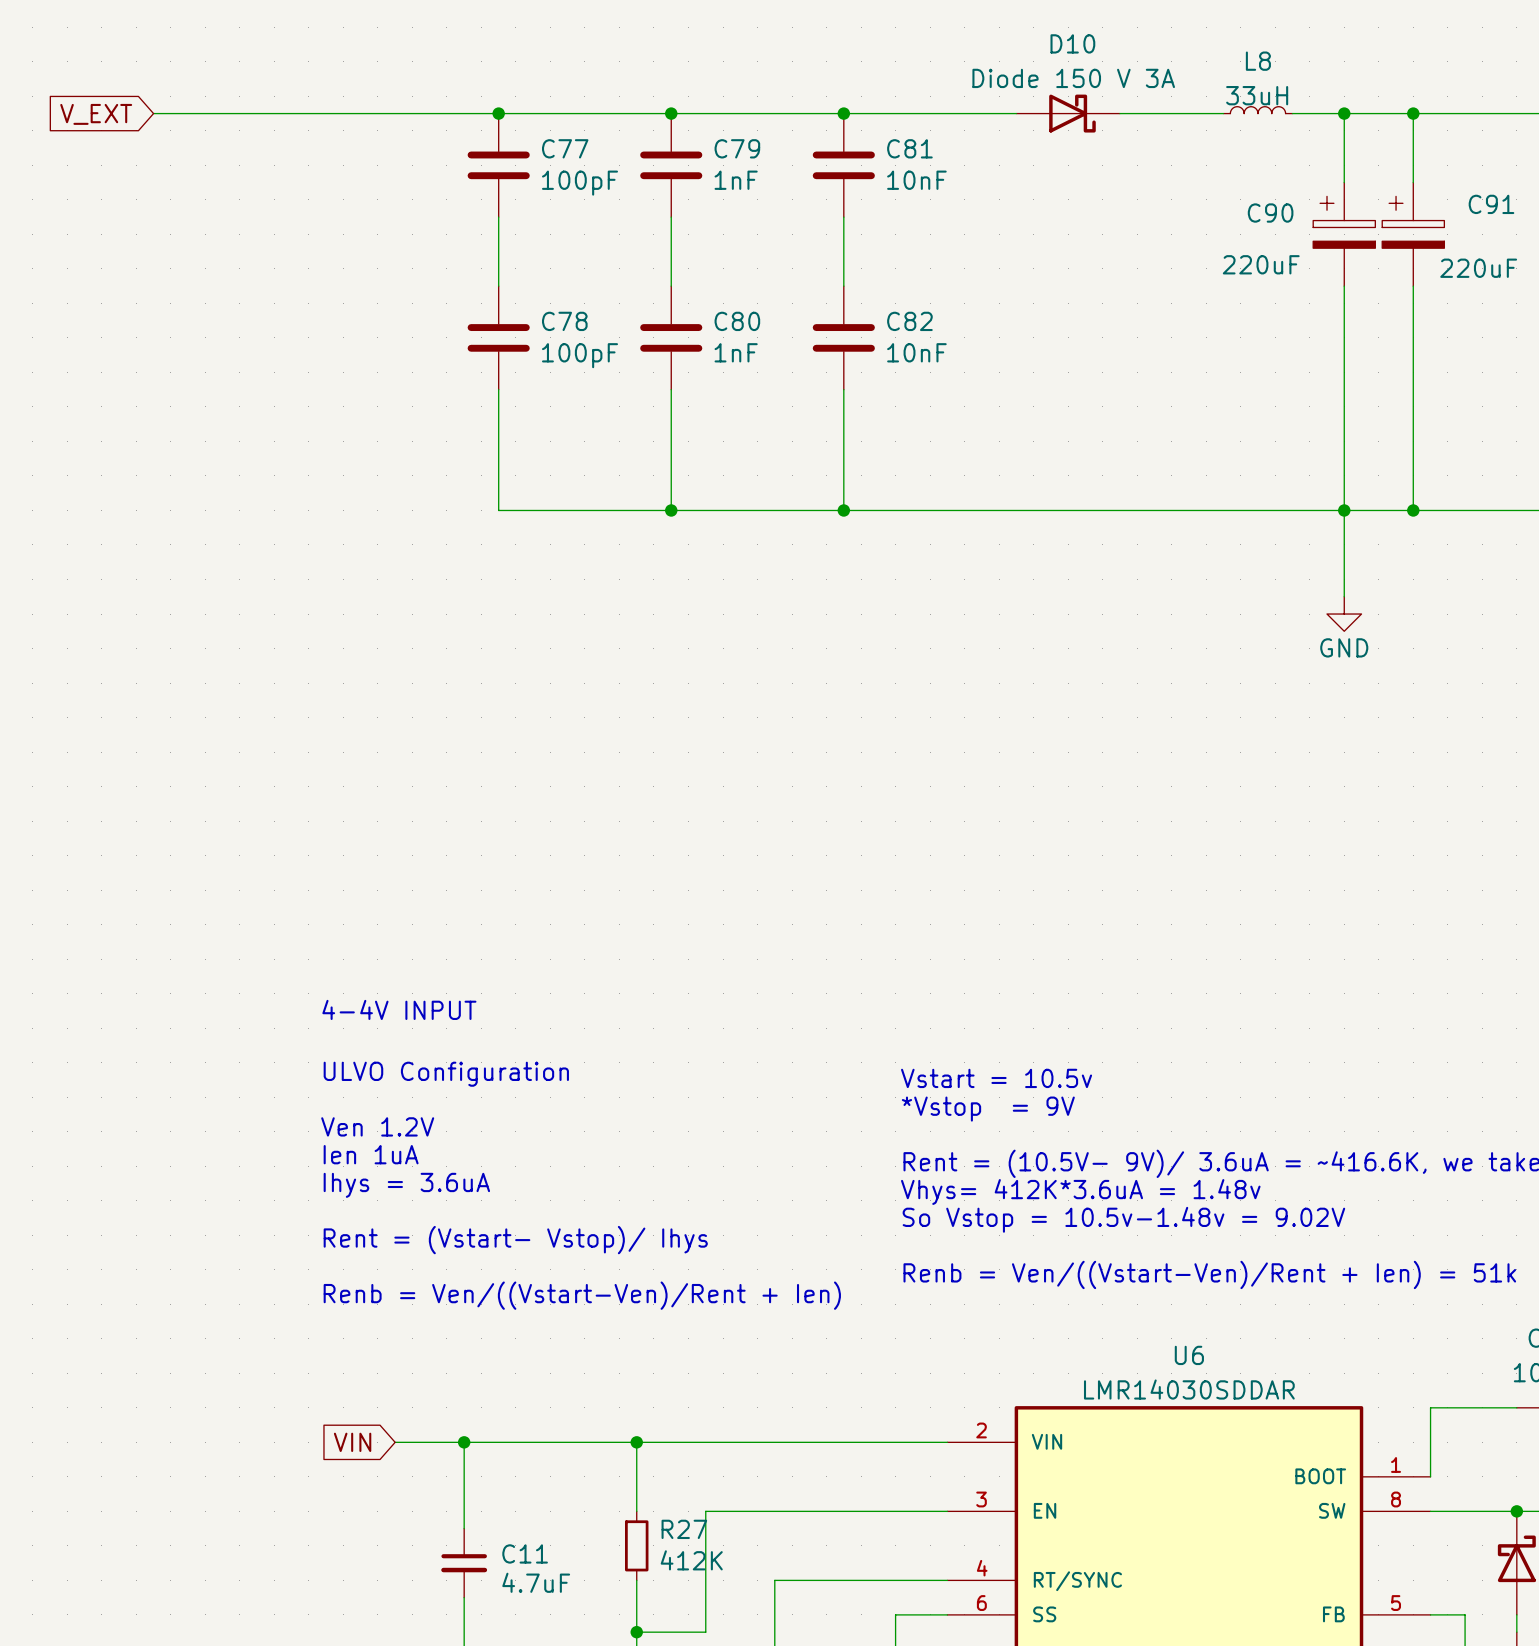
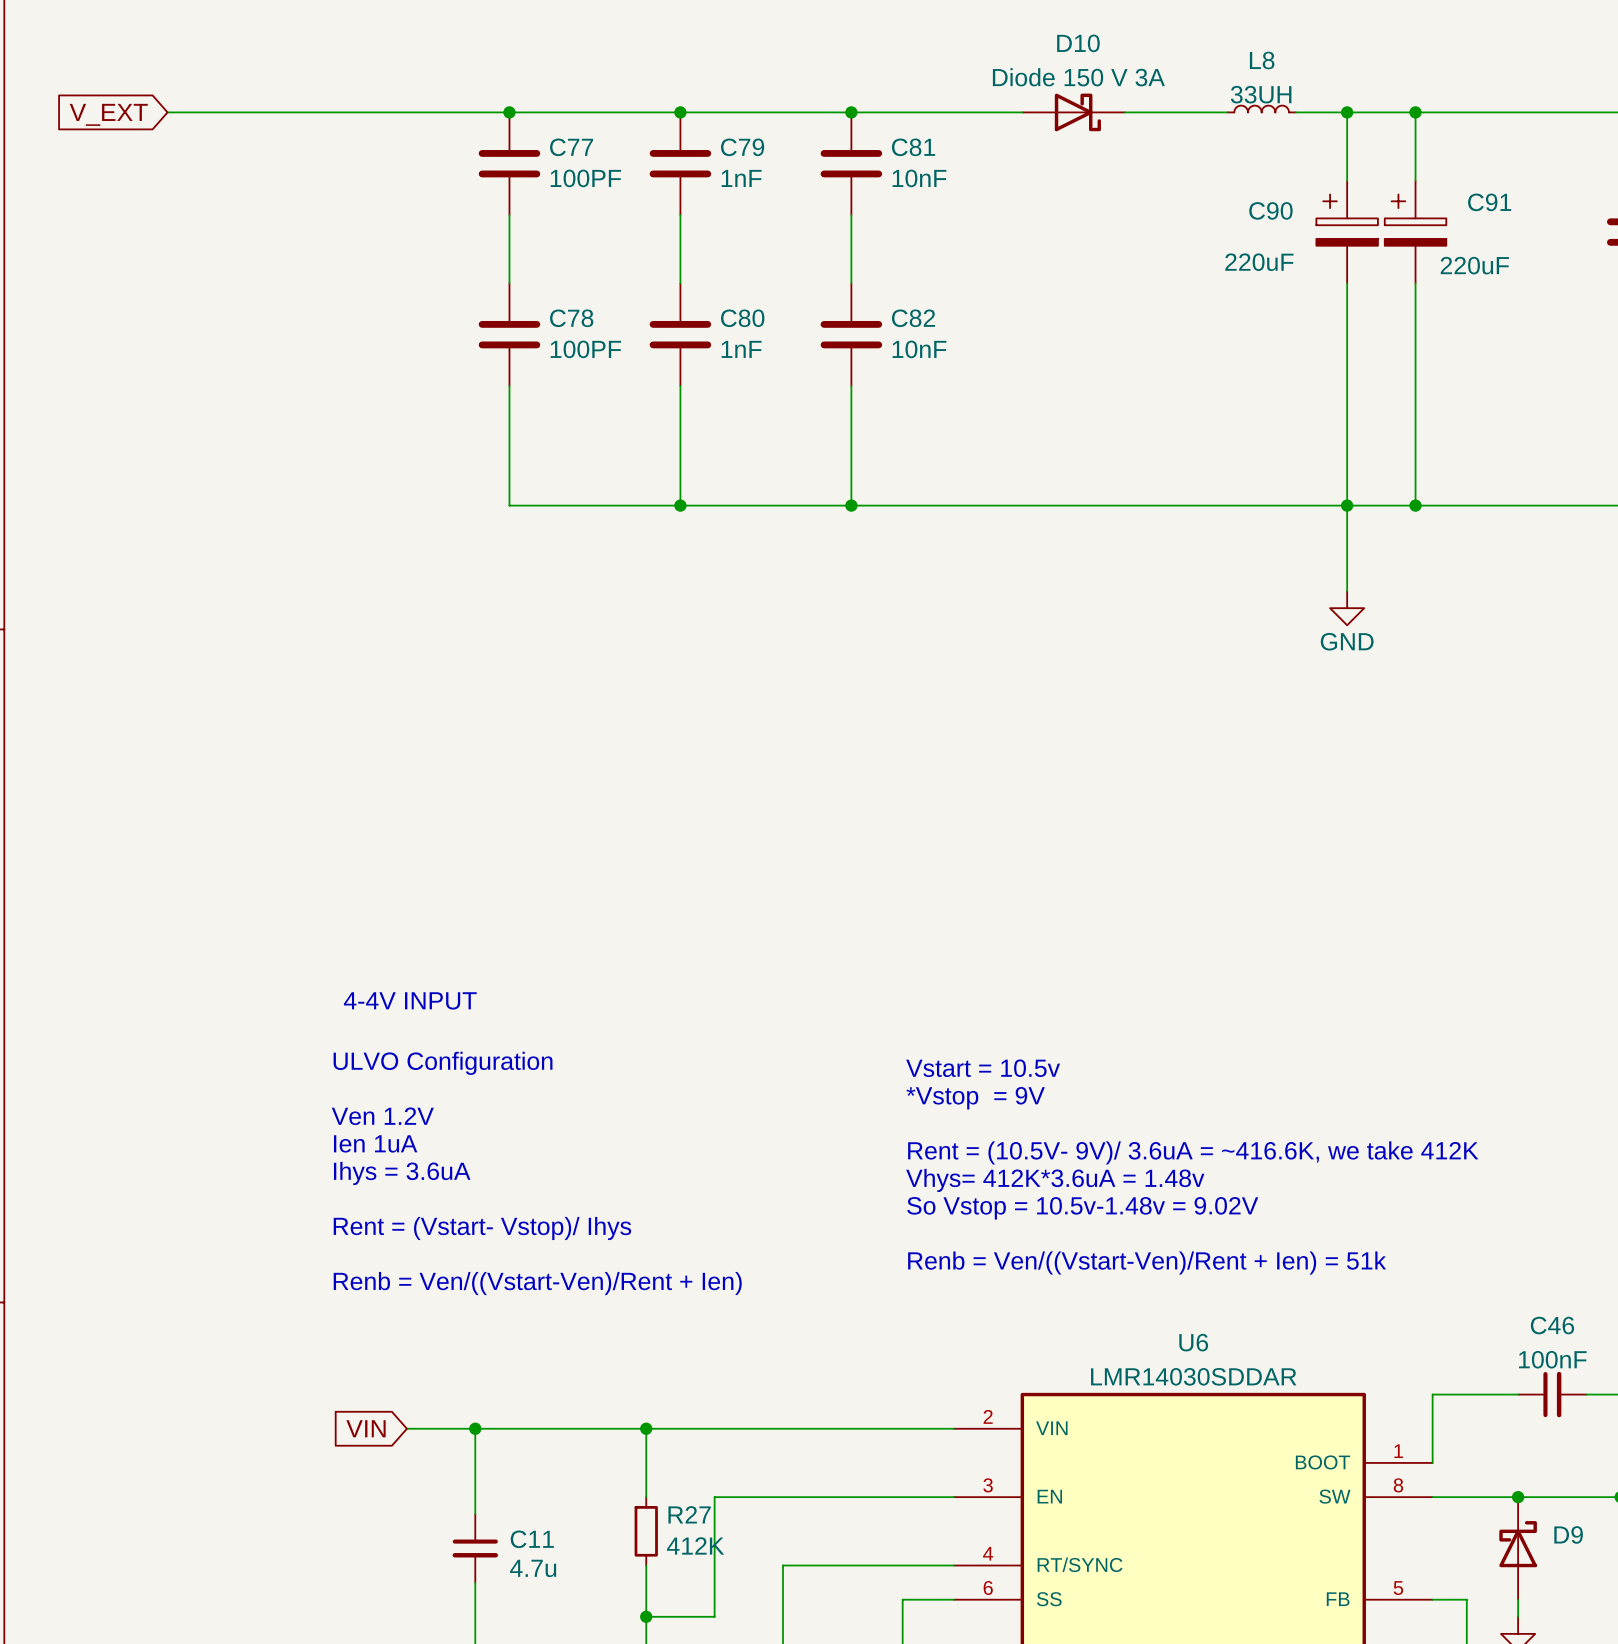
L8 value: 33uH (1257, 95) -> 33UH (1261, 94)
C77 value: 100pF (580, 183) -> 100PF (585, 178)
C78 value: 100pF (580, 355) -> 100PF (585, 349)
C11 value: 4.7uF (536, 1582) -> 4.7u (533, 1568)

